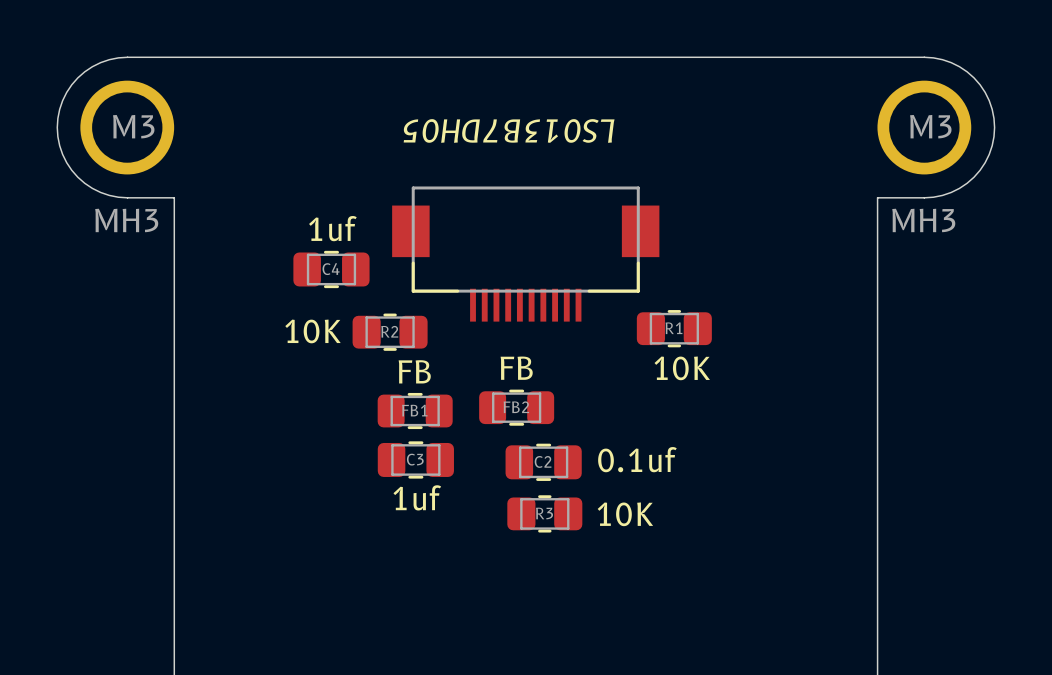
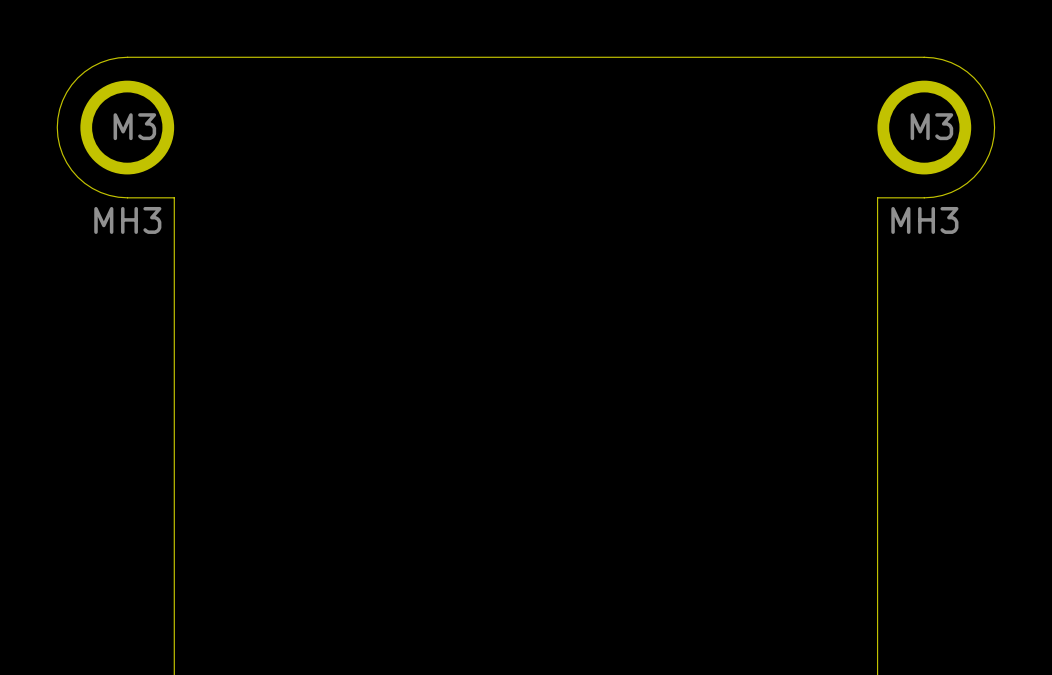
part: LS013B7DH05 (525, 254) -> none
C4: 1uf (331, 269) -> none
R1: 10K (674, 328) -> none
R2: 10K (390, 332) -> none
FB2: FB (516, 407) -> none
FB1: FB (415, 411) -> none
C3: 1uf (415, 459) -> none
C2: 0.1uf (543, 462) -> none
R3: 10K (544, 513) -> none

